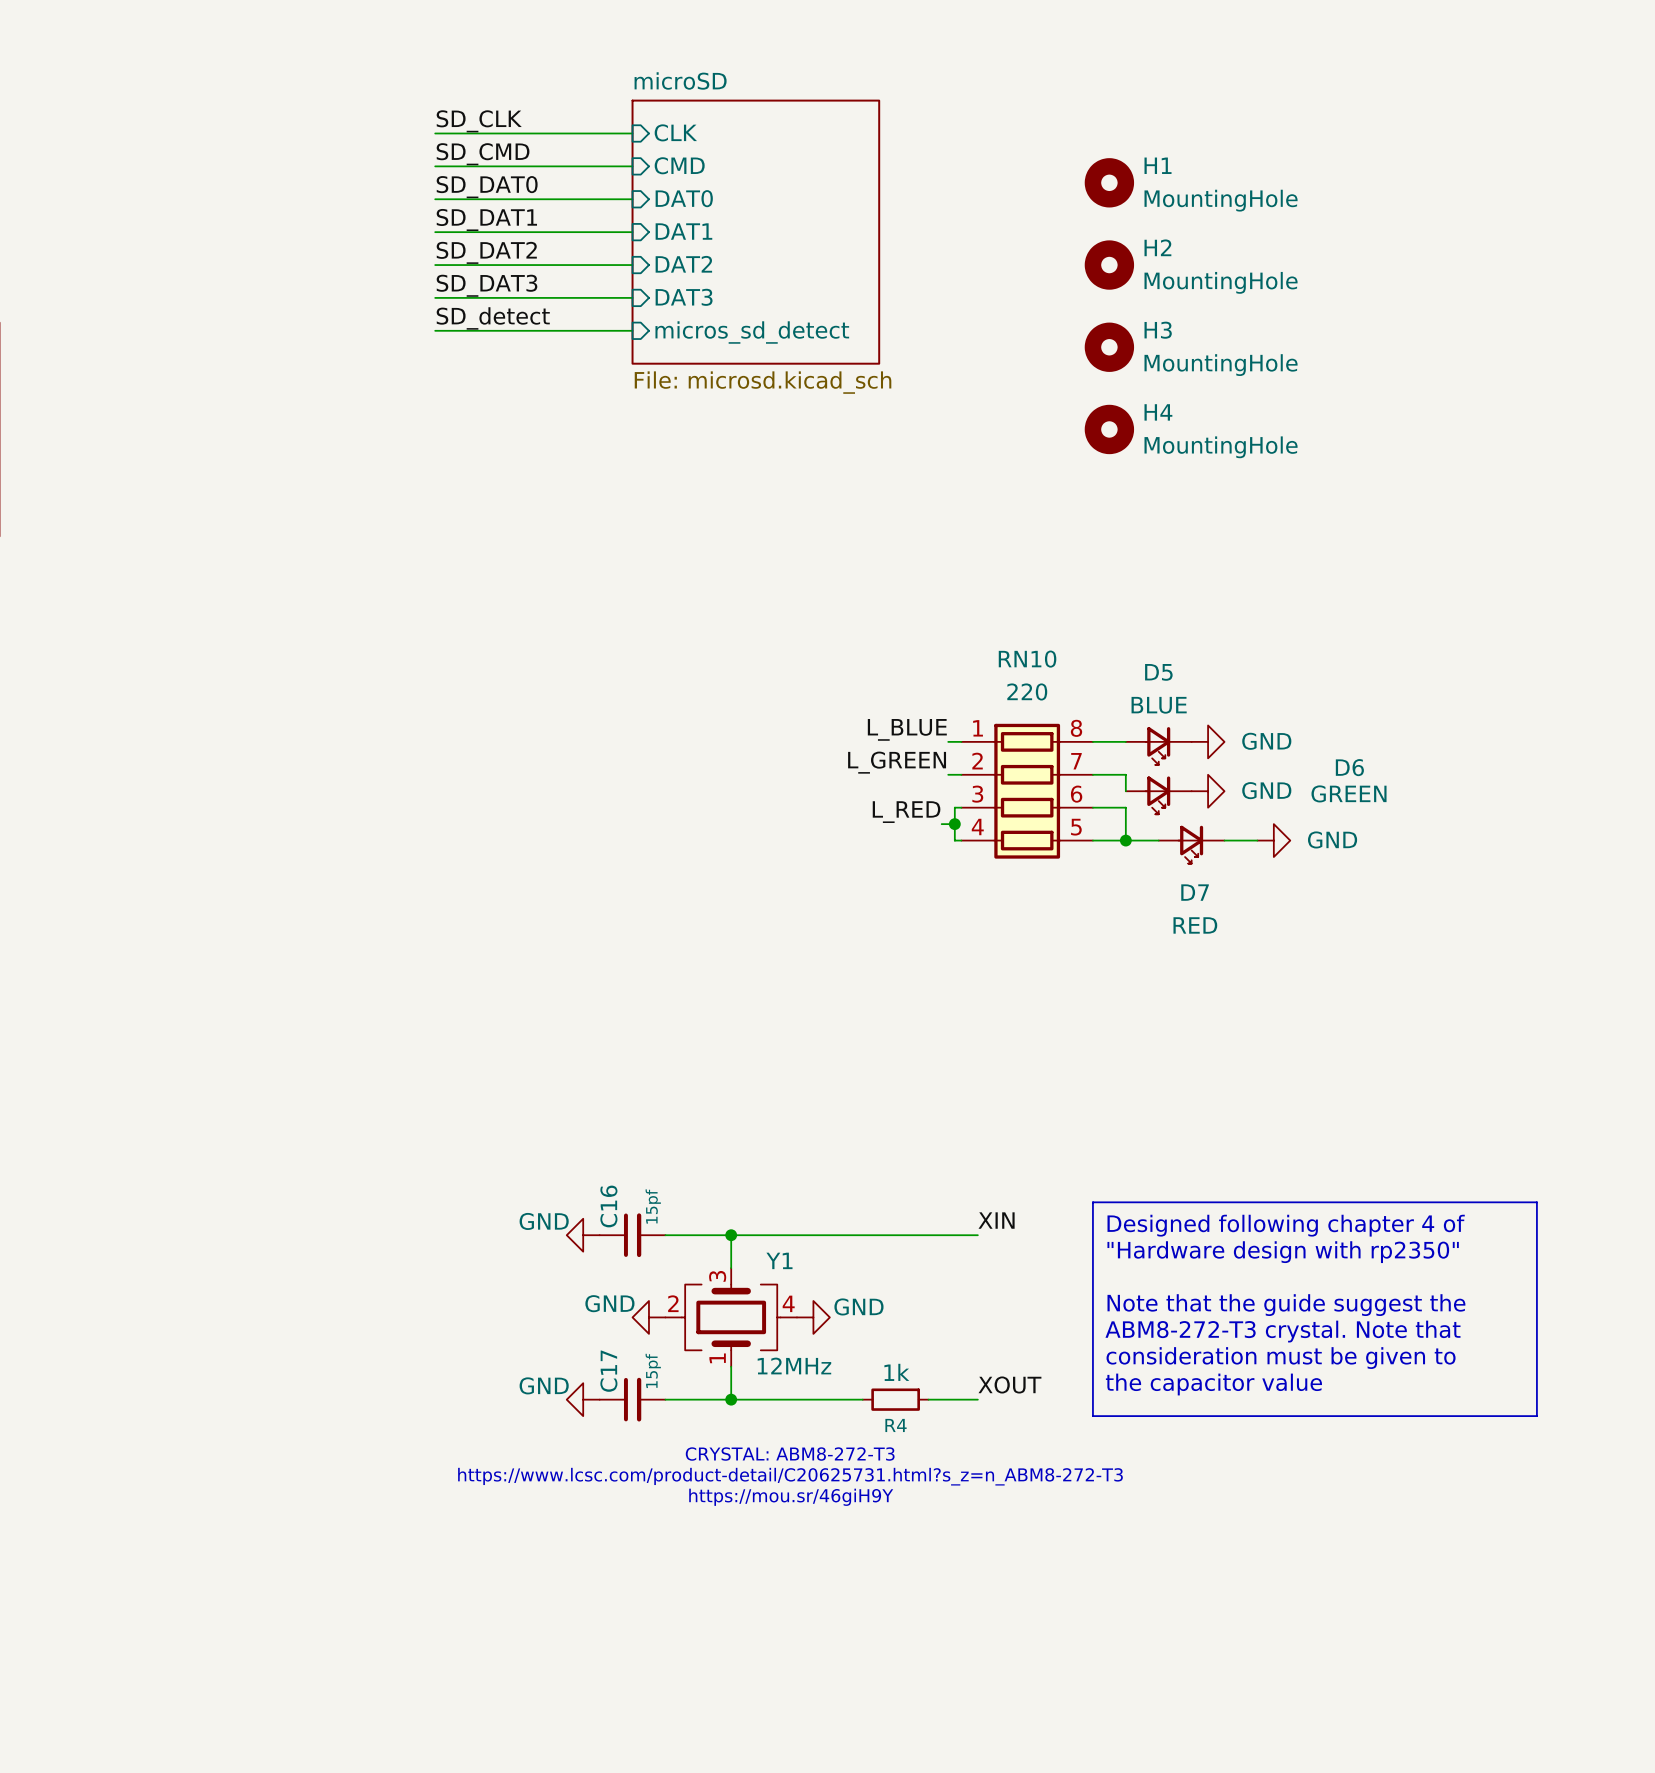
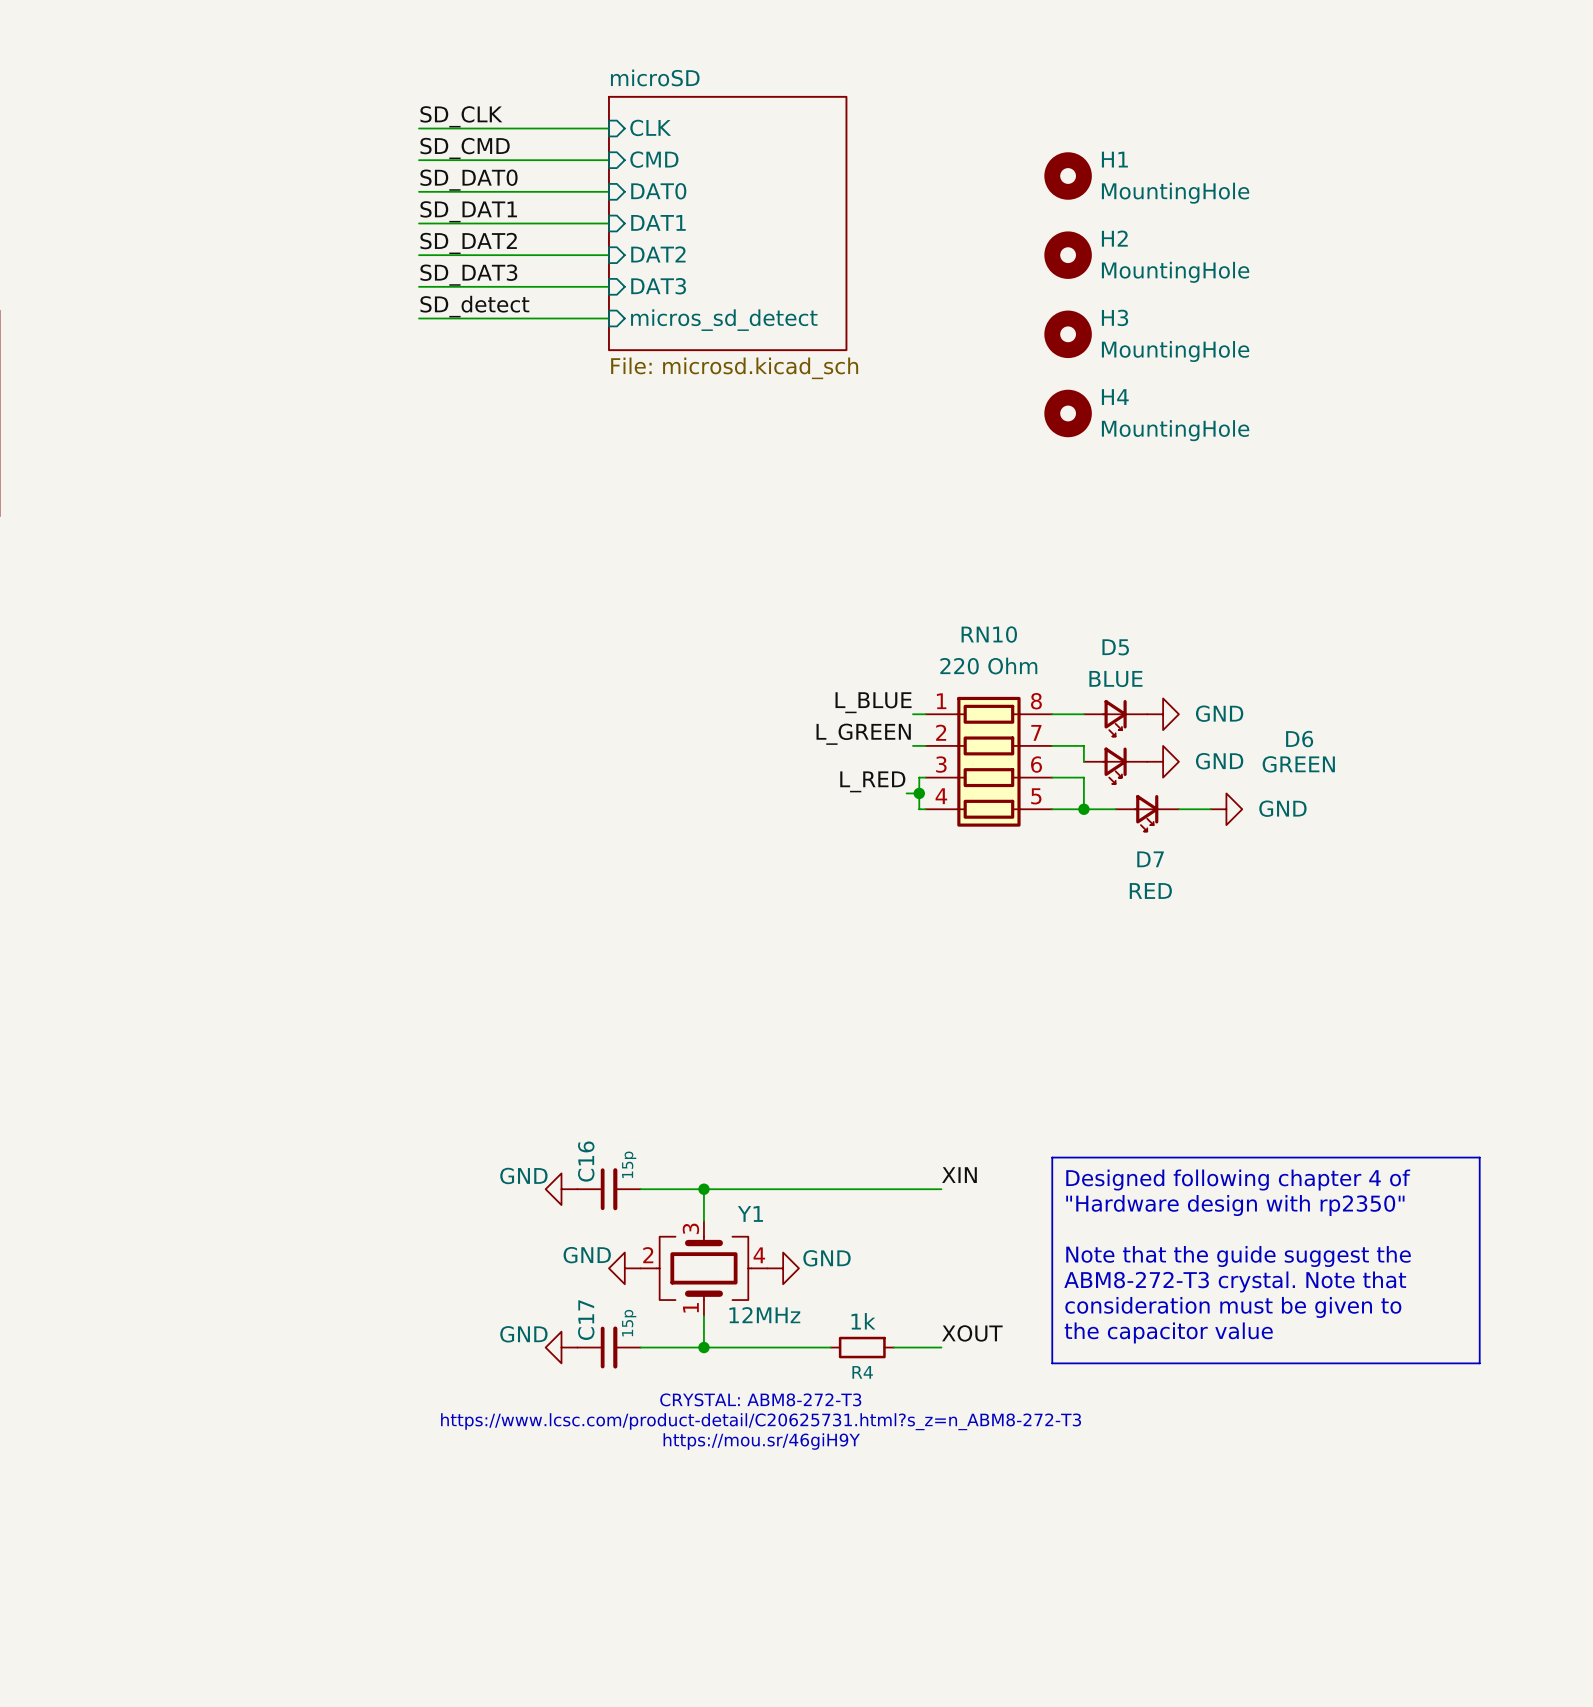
RN10 value: 220 (1027, 691) -> 220 Ohm (988, 666)
C16 value: 15pf (653, 1206) -> 15p (629, 1164)
C17 value: 15pf (653, 1370) -> 15p (629, 1323)

